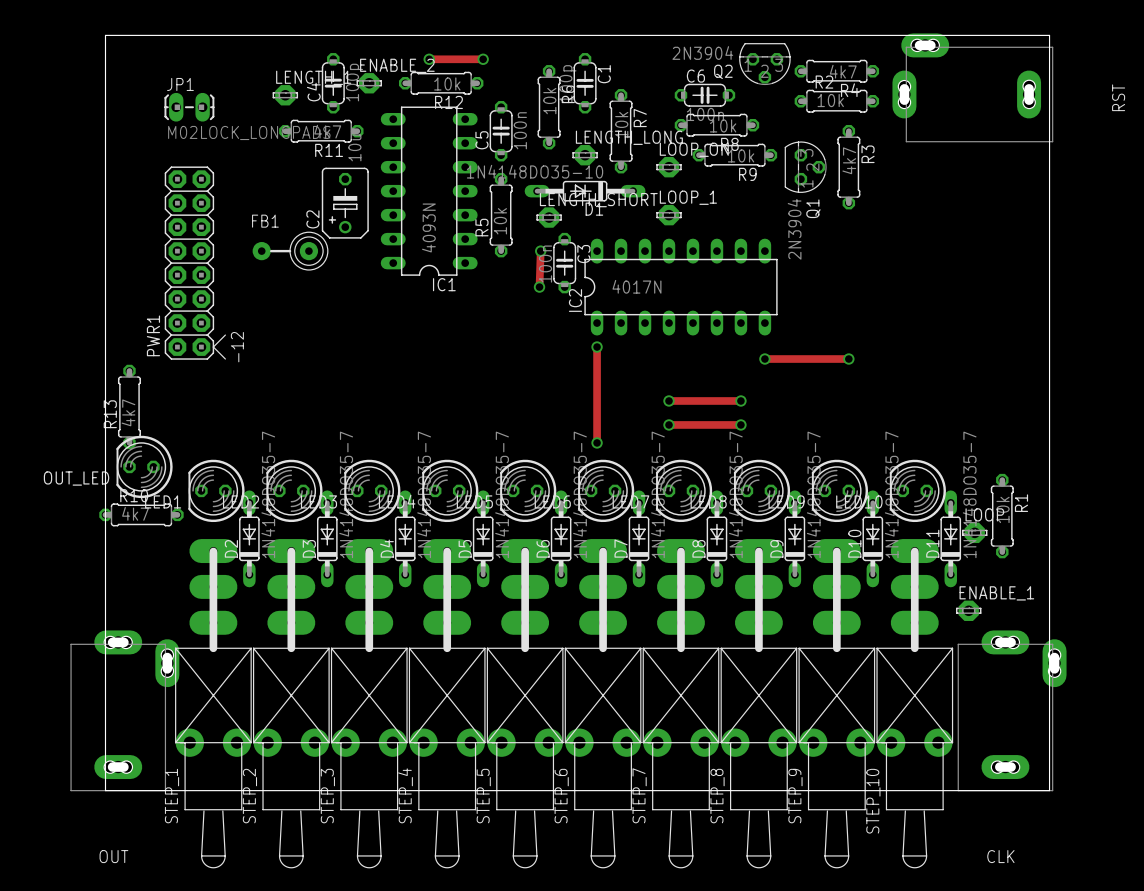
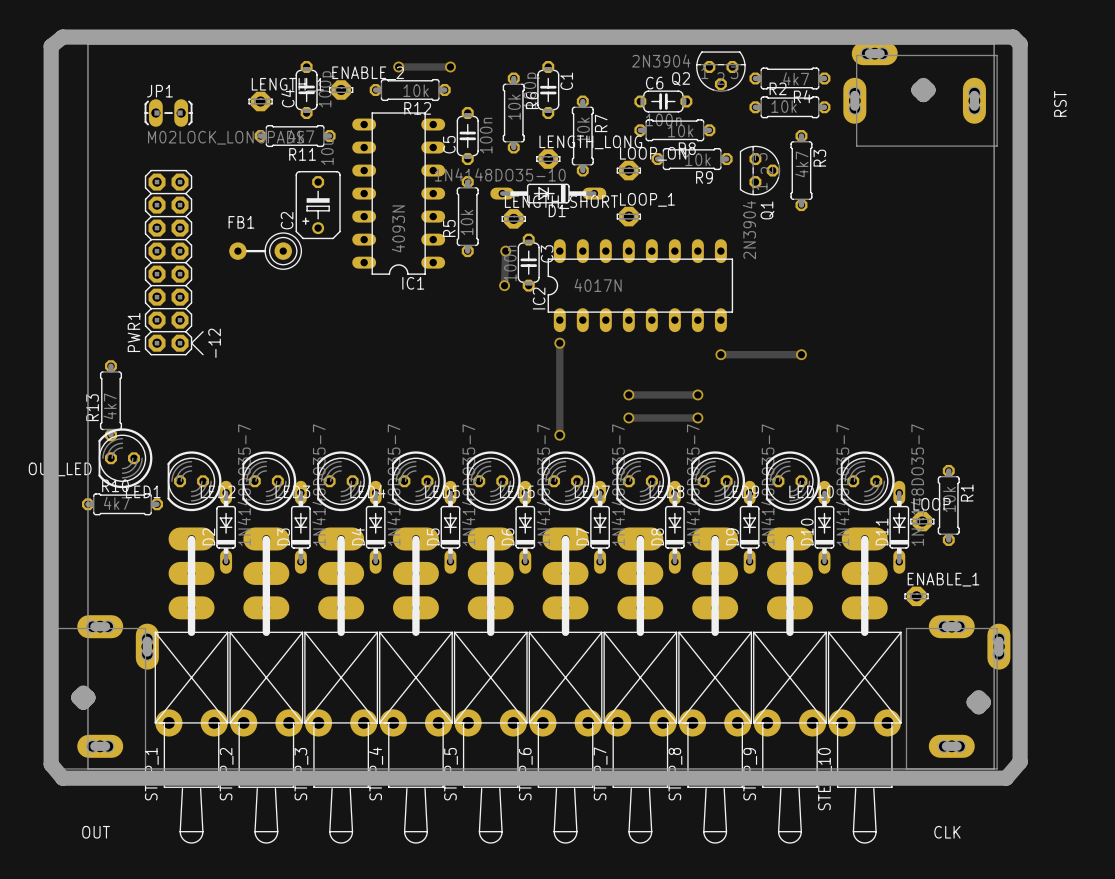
board edge: none -> (62, 37) (1013, 37) (1020, 43) (1020, 762) (1006, 778) (62, 778) (51, 764) (51, 46) (62, 37)
board edge: none -> (923, 85) (928, 90) (923, 94) (918, 90) (921, 87)
board edge: none -> (83, 693) (87, 697) (83, 702) (78, 697) (81, 695)
board edge: none -> (978, 697) (983, 702) (978, 706) (974, 702) (976, 699)

